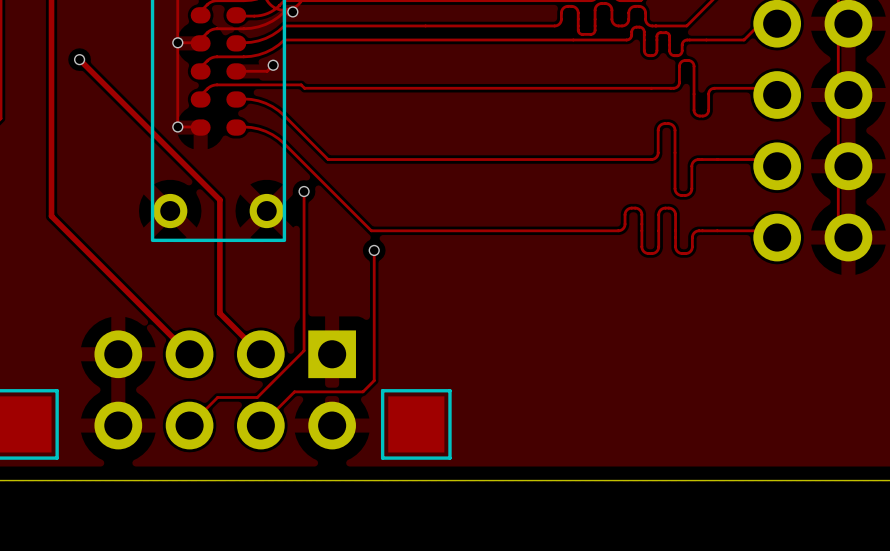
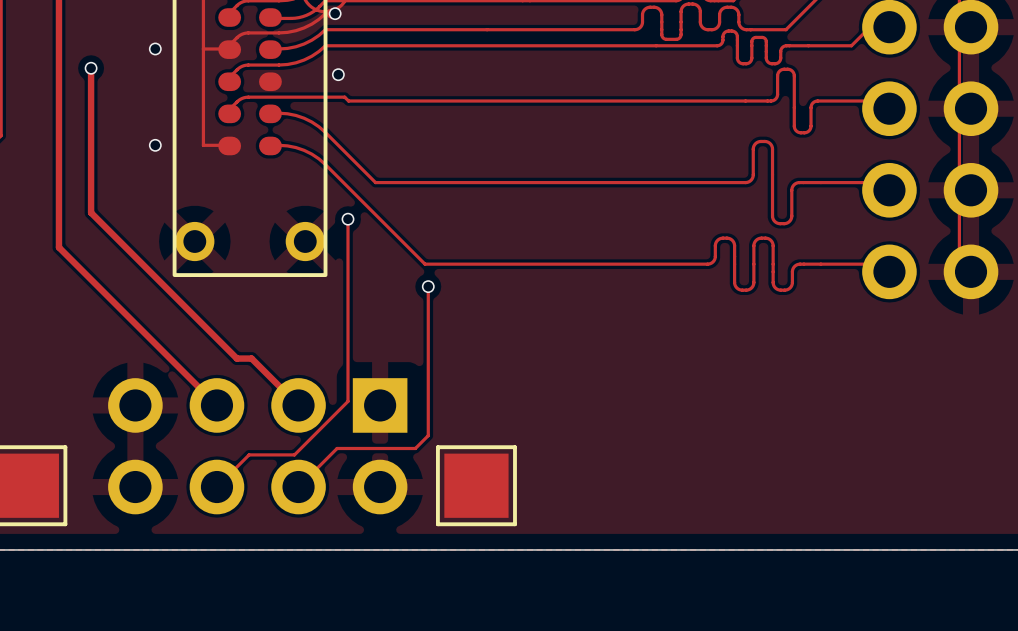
via position: (177, 42) -> (155, 48)
track: (79, 59) (219, 199) (219, 313) -> (91, 68) (91, 212) (236, 358) (251, 358)
track: (273, 65) (267, 71) (236, 71) -> none
via position: (273, 65) -> (338, 74)
via position: (177, 126) -> (155, 145)

